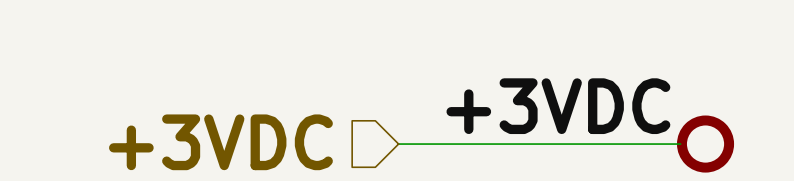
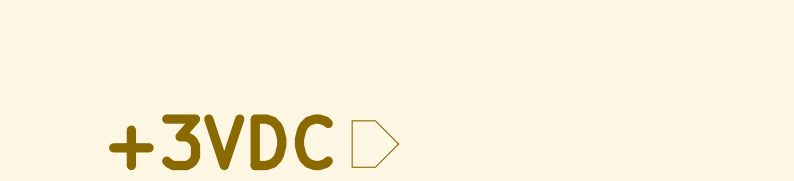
label: +3VDC (558, 106) -> none
wire: (398, 144) (680, 144) -> none
part: (705, 144) -> none

